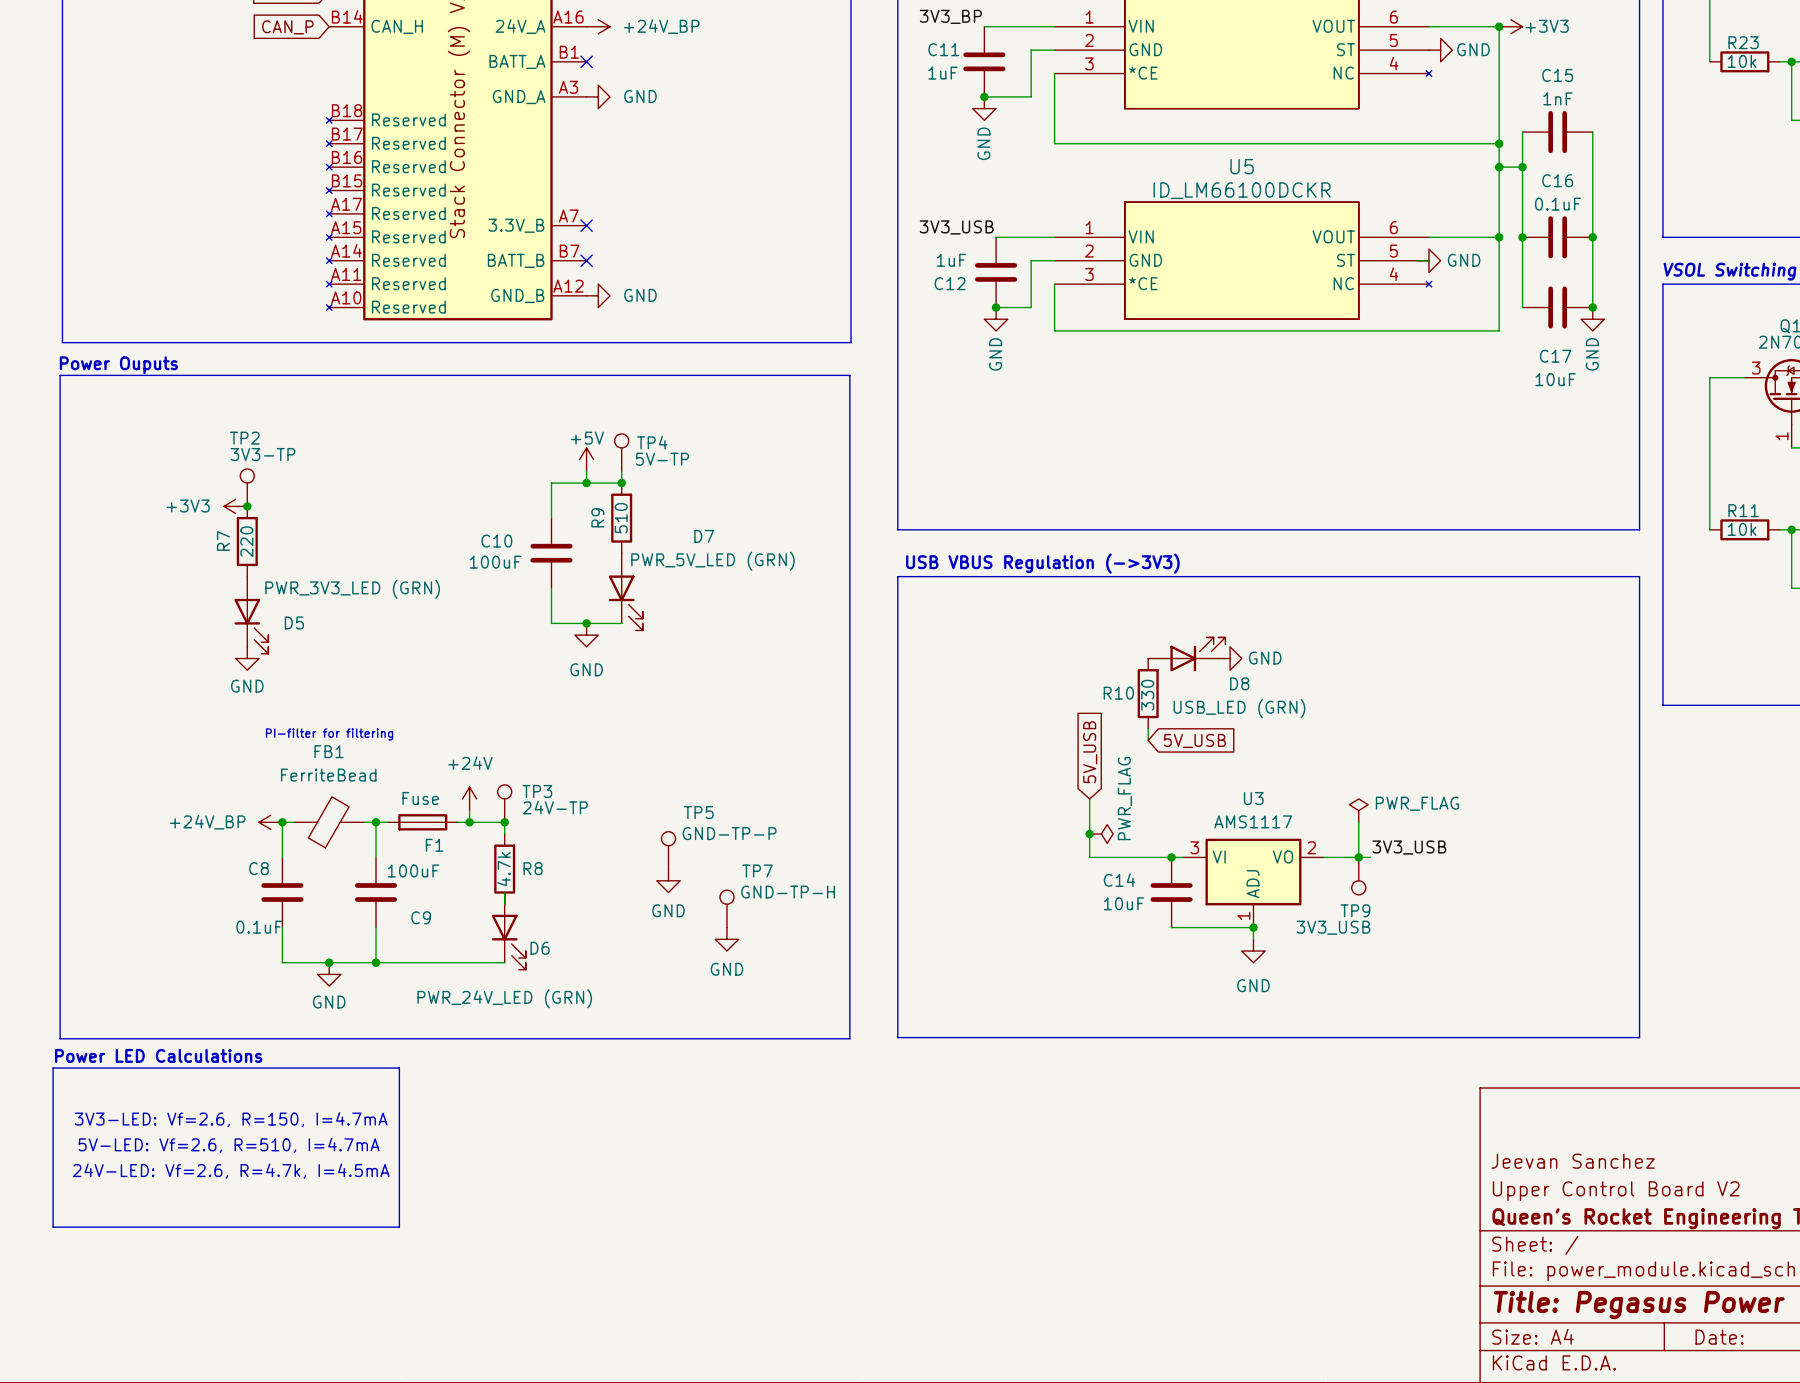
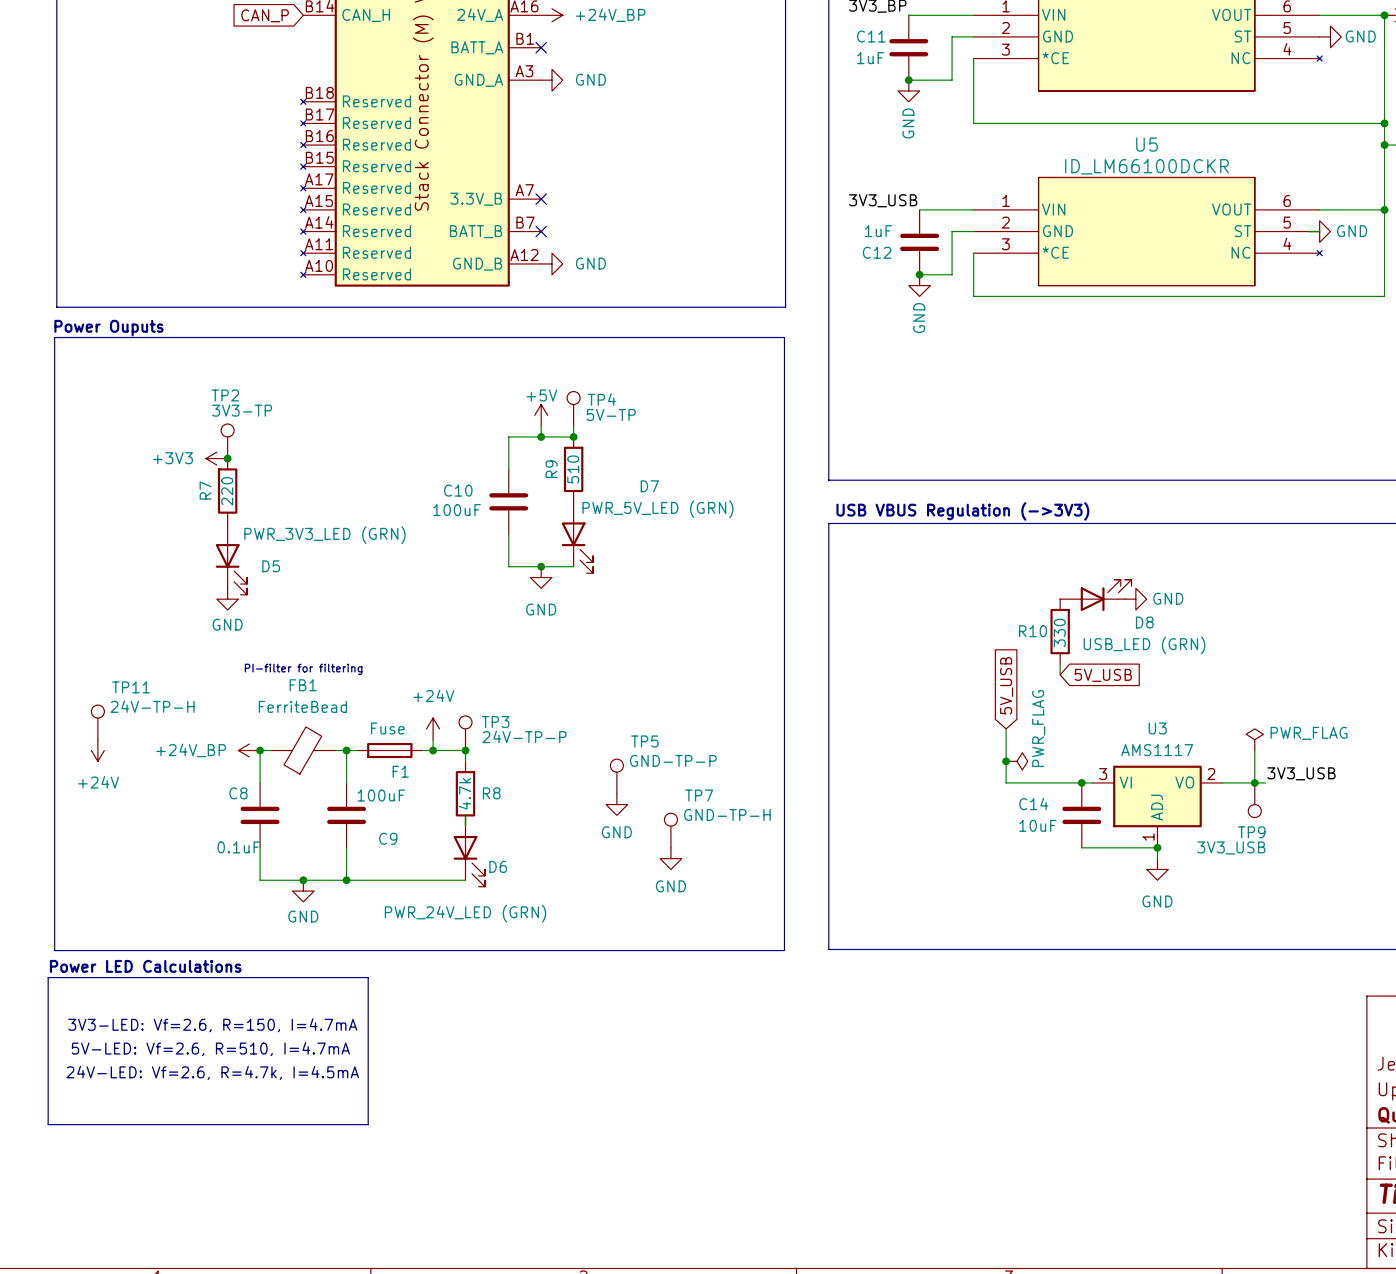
TP11: none -> 24V-TP-H (97, 722)
TP3 value: 24V-TP (555, 807) -> 24V-TP-P (524, 736)
power symbol: none -> +24V (97, 750)

